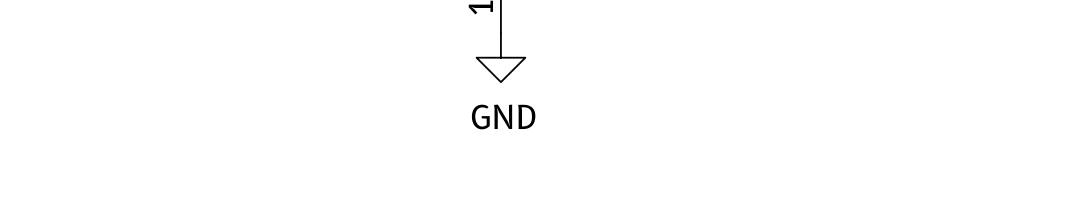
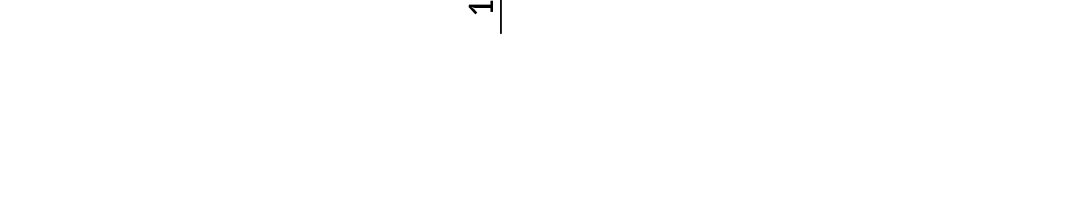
power symbol: GND (500, 57) -> none

